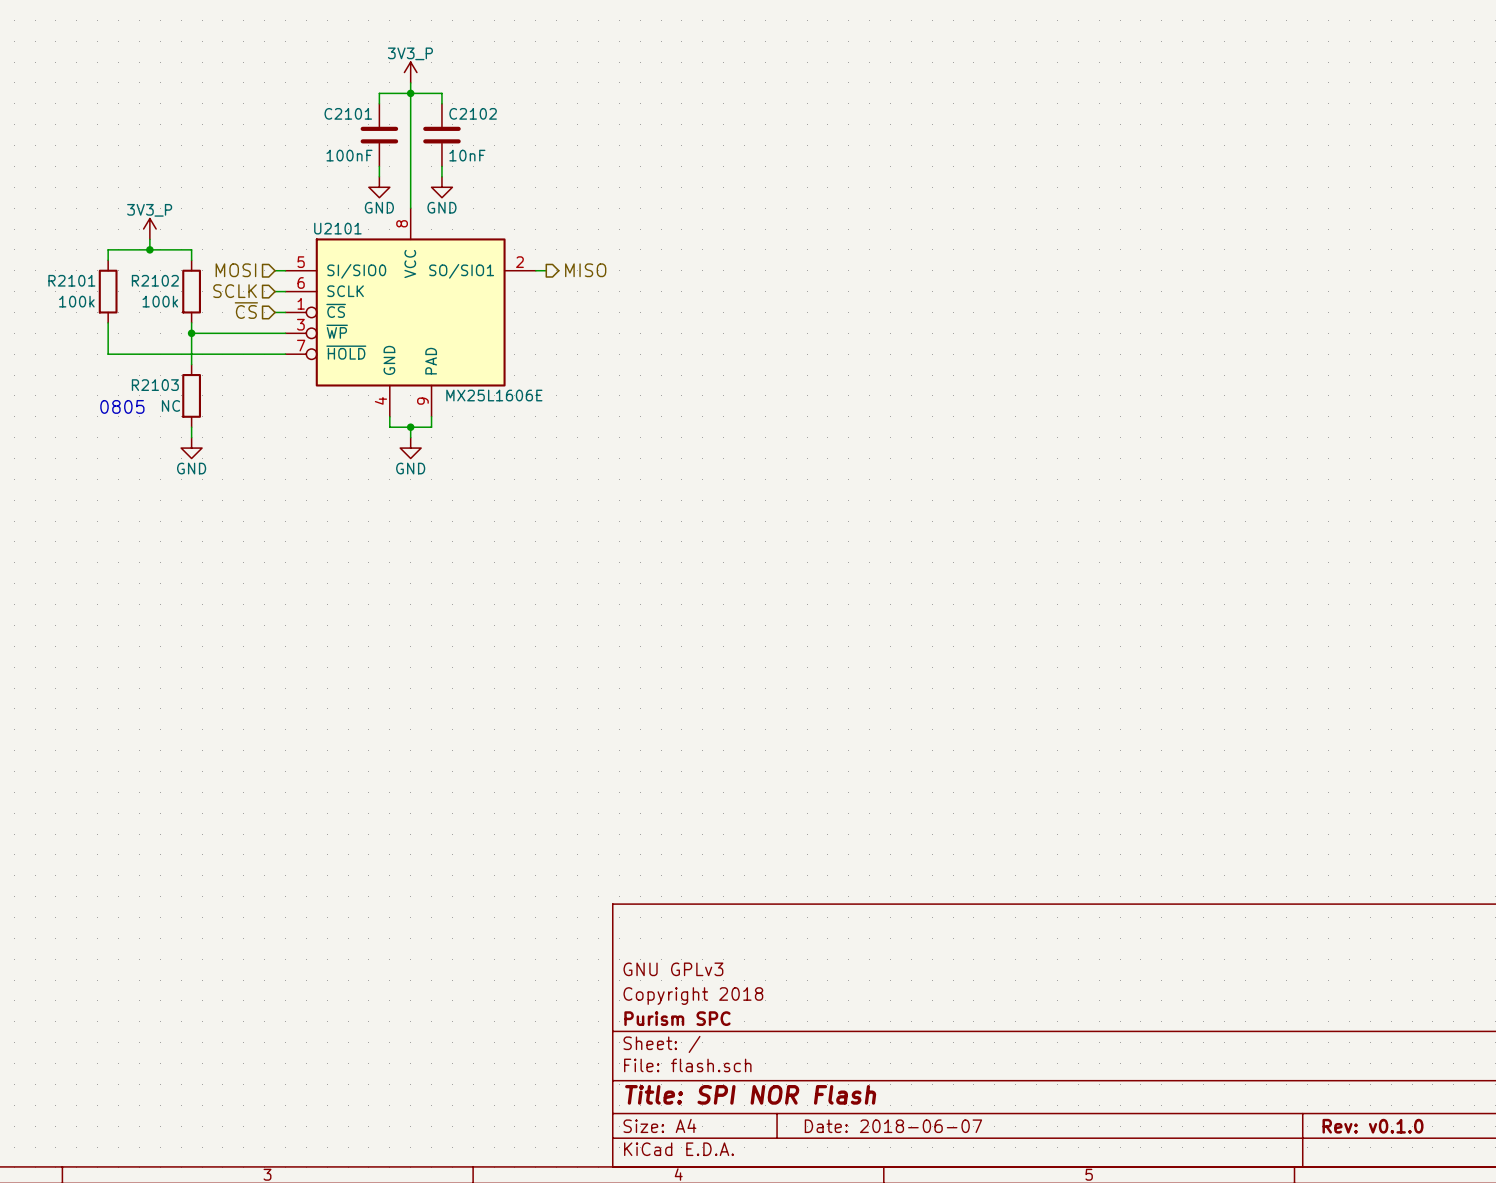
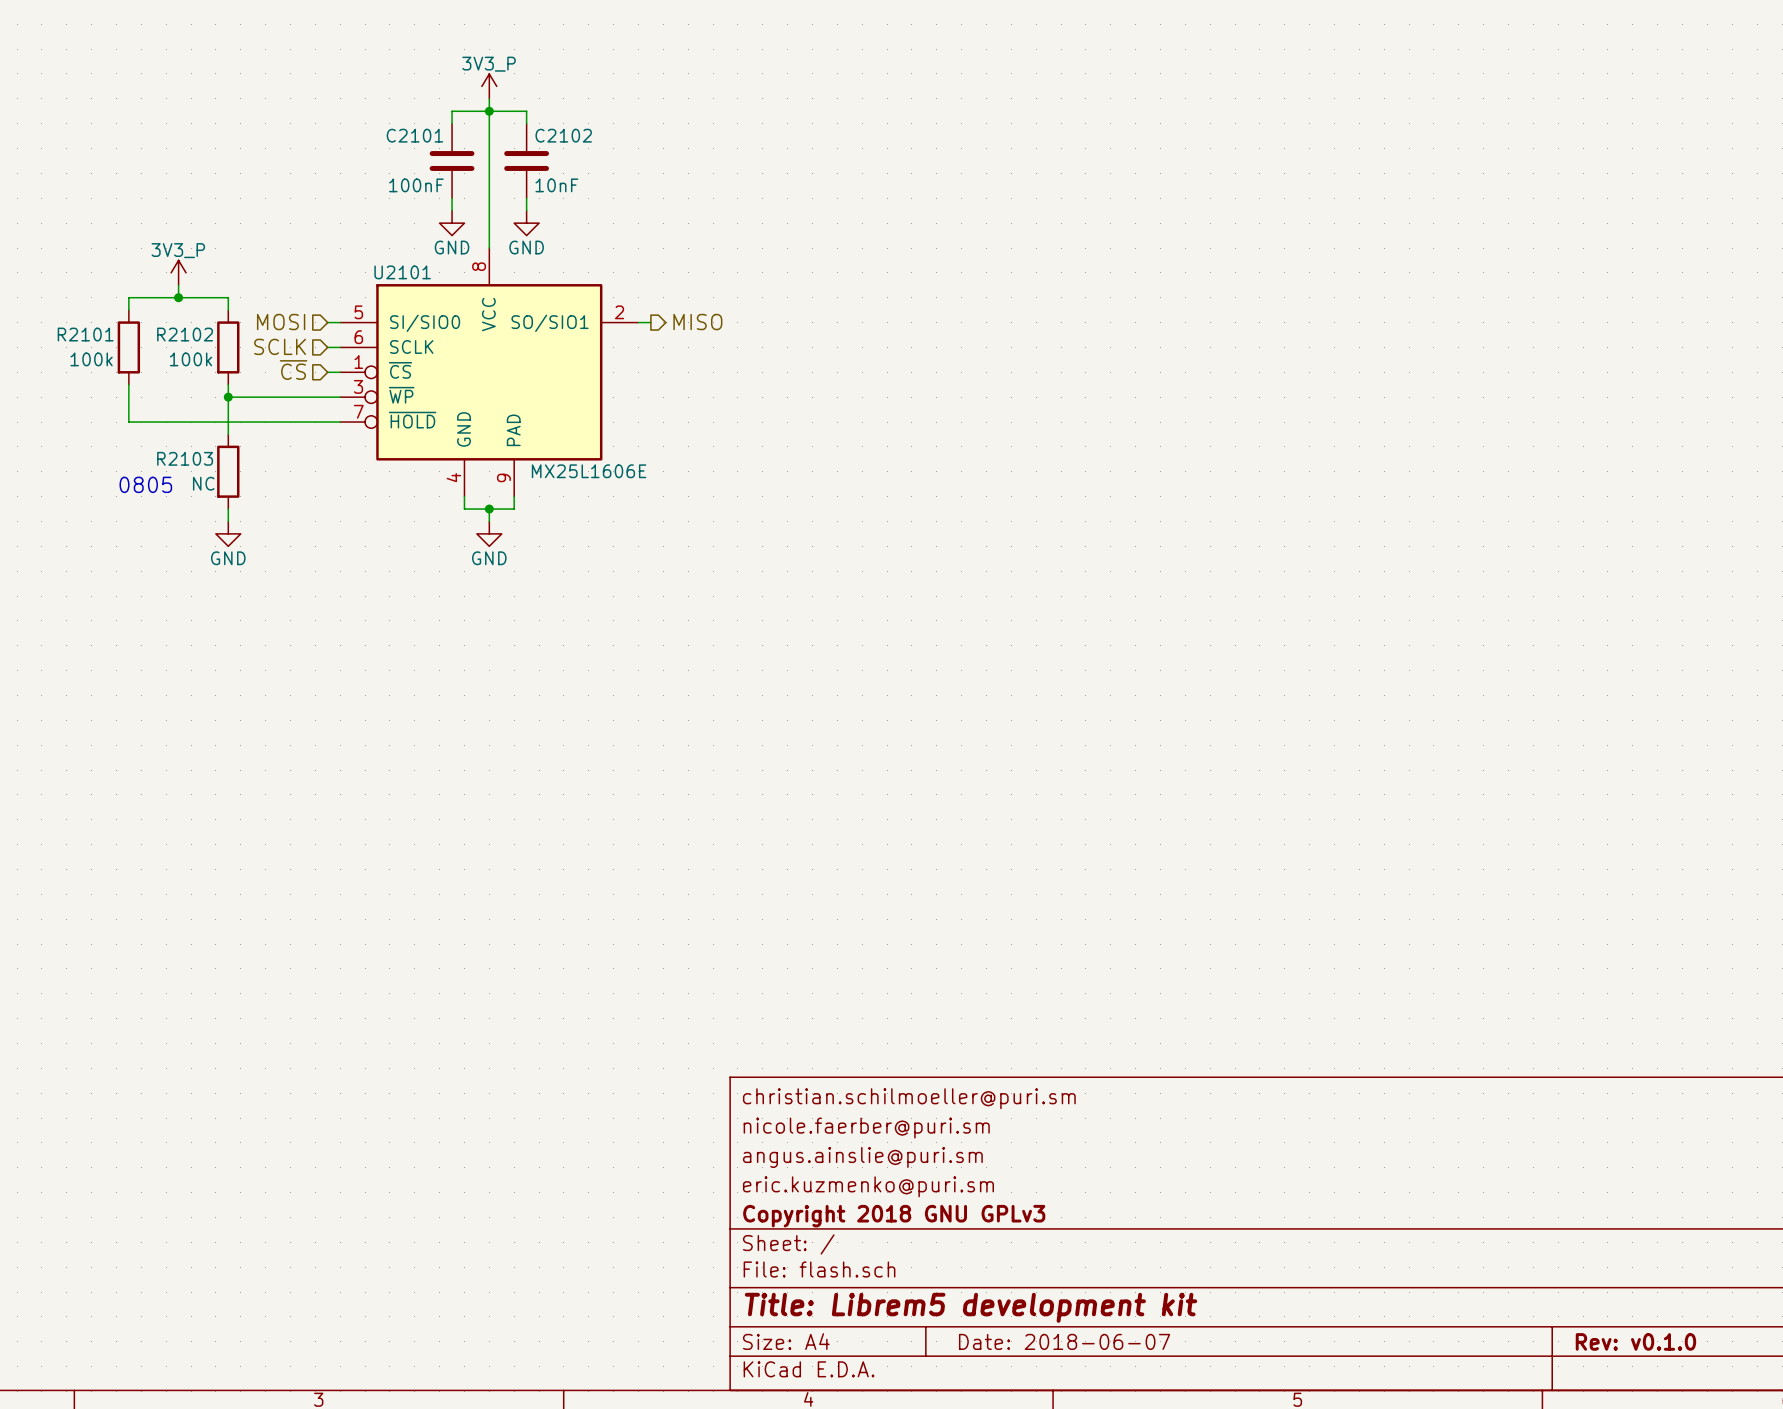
title block: none -> christian.schilmoeller@puri.sm (909, 1098)
title block: none -> nicole.faerber@puri.sm (866, 1128)
title block: GNU GPLv3 (673, 969) -> angus.ainslie@puri.sm (862, 1157)
title block: Copyright 2018 (693, 996) -> eric.kuzmenko@puri.sm (868, 1186)
title block: Purism SPC (677, 1018) -> Copyright 2018 GNU GPLv3 (894, 1216)
title block: Title: SPI NOR Flash (750, 1094) -> Title: Librem5 development kit (971, 1307)

